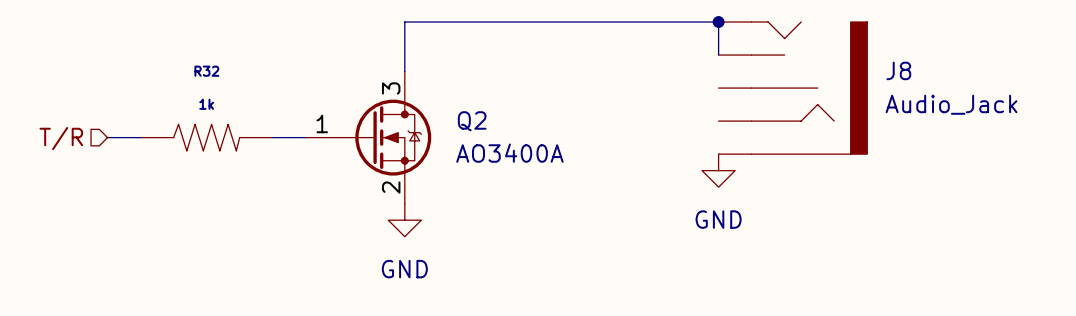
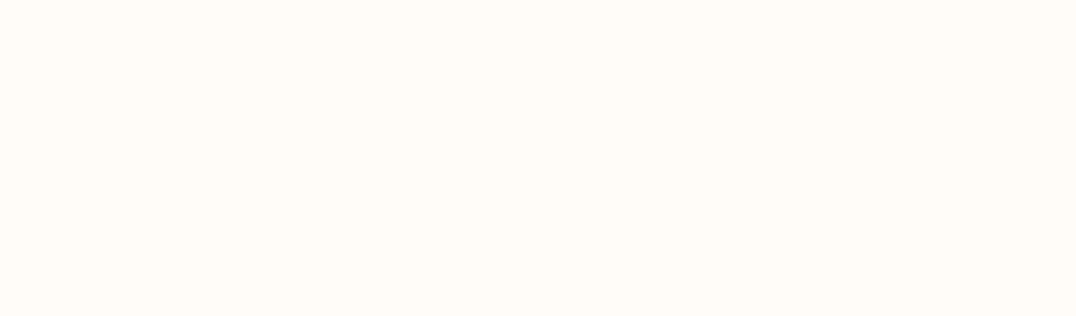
junction: (718, 22) -> none
wire: (718, 55) (718, 22) (404, 22) (404, 71) -> none
J8: Audio_Jack (792, 88) -> none
wire: (107, 137) (140, 137) -> none
R32: 1k (206, 137) -> none
wire: (272, 137) (305, 137) -> none
Q2: AO3400A (368, 137) -> none
hierarchical label: T/R (61, 138) -> none
power symbol: GND (718, 170) -> none
power symbol: GND (404, 220) -> none

